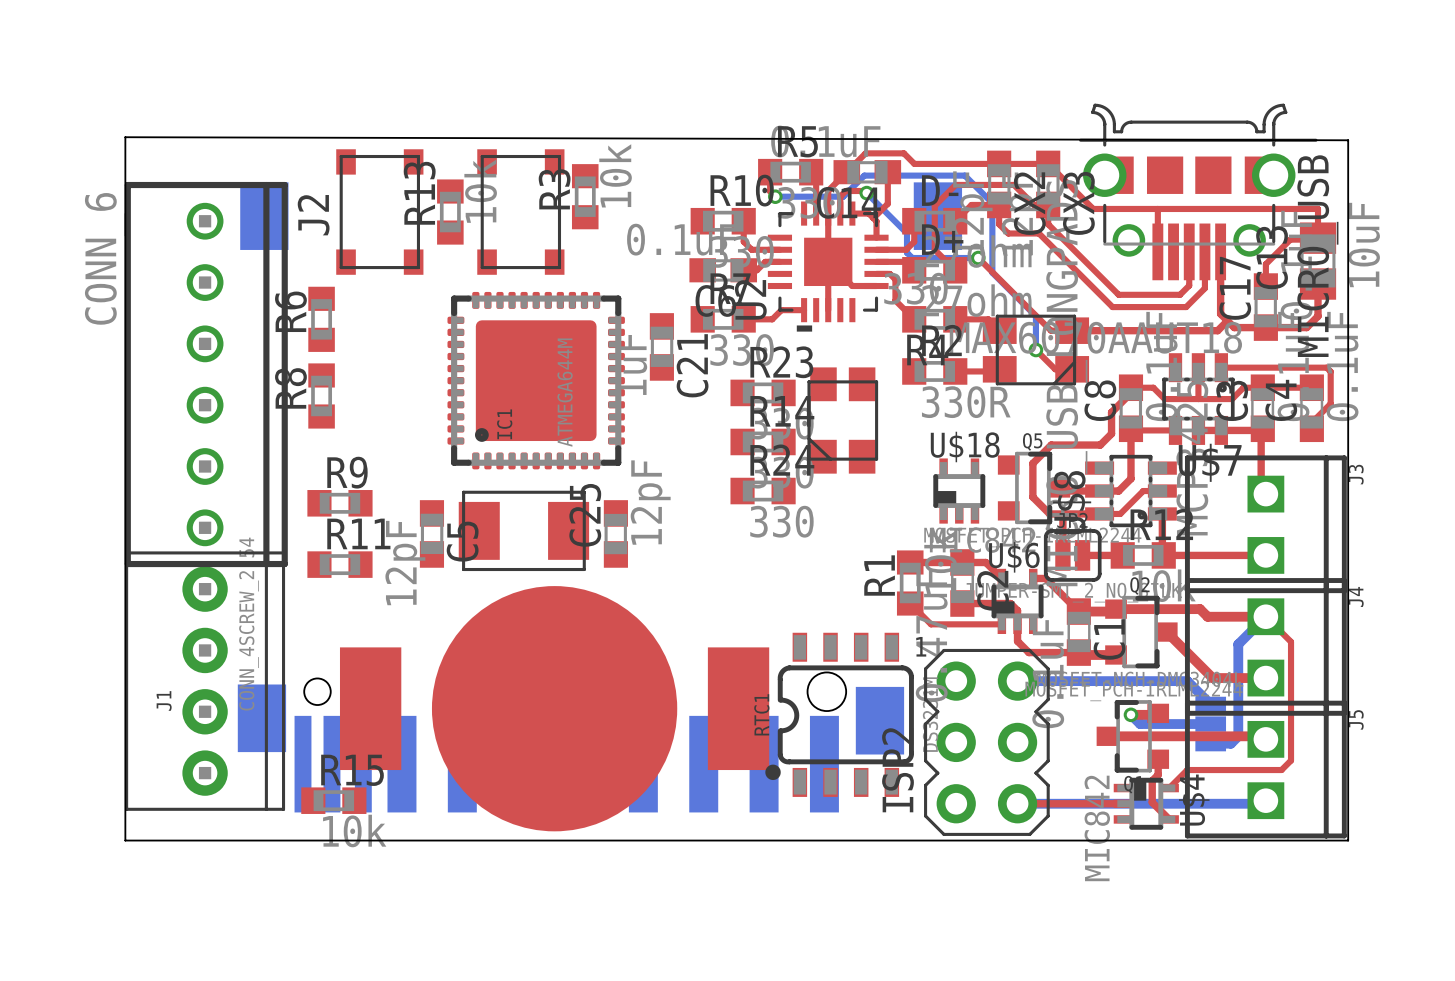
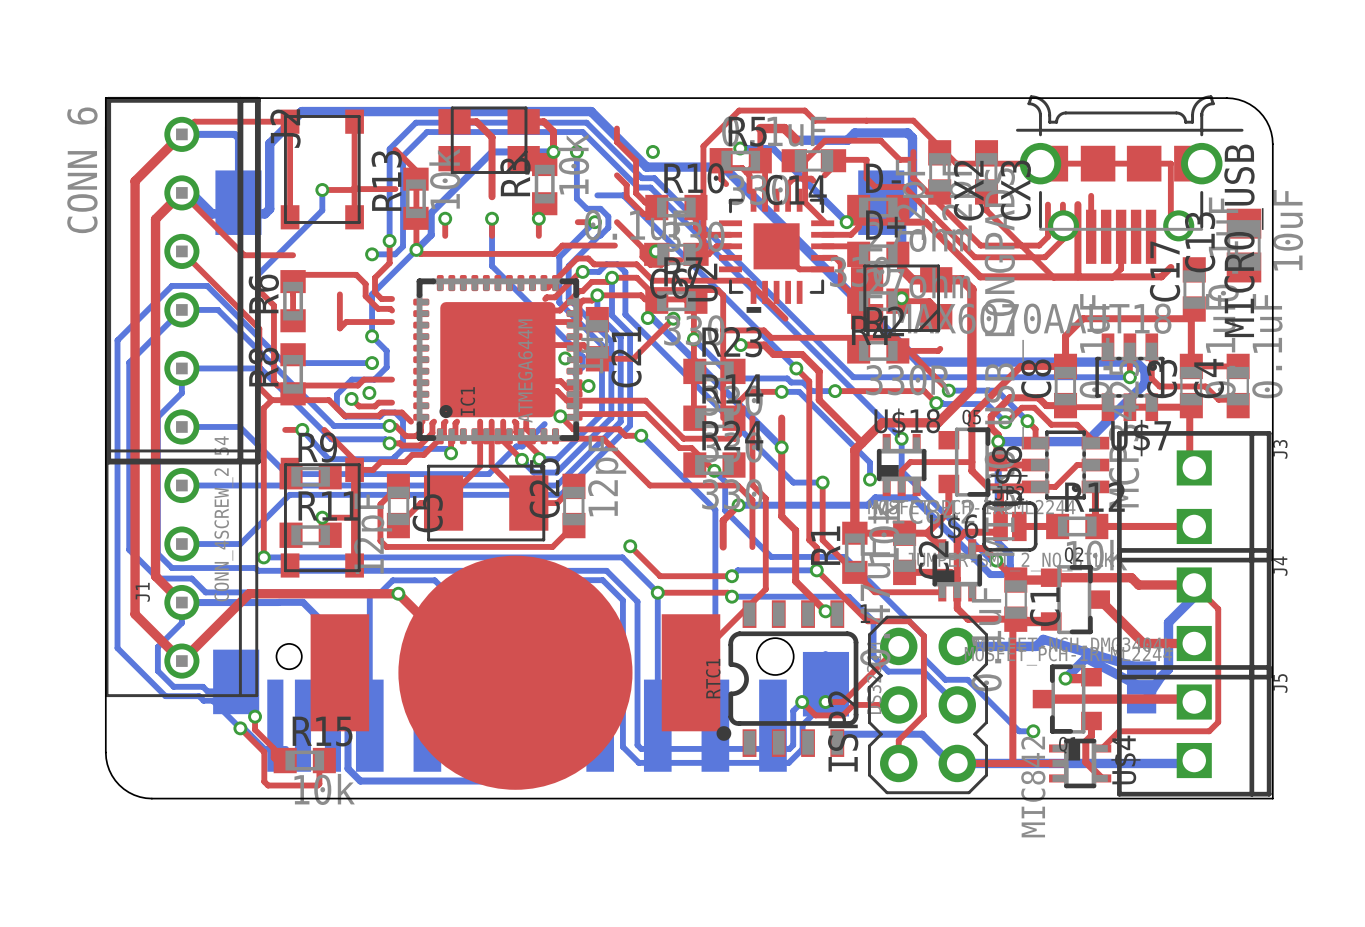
top track: none -> (354, 121) (354, 217)
top track: none -> (454, 121) (476, 121) (492, 137) (492, 196)
top track: none -> (523, 121) (543, 121) (553, 131) (553, 151)
board edge: (125, 137) (1348, 140) (1348, 154) -> (105, 127) (105, 98) (1226, 98) (1244, 101) (1259, 111) (1269, 126) (1272, 144)
top track: none -> (616, 128) (616, 142) (636, 161) (636, 193) (645, 202) (657, 202)
bottom track: none -> (181, 134) (234, 134) (238, 138) (238, 202)
part: none -> (489, 140)
top track: none -> (796, 140) (784, 128) (760, 128) (760, 158) (746, 172)
bottom track: none -> (796, 140) (847, 140) (854, 132) (907, 132) (912, 137) (912, 209) (901, 219) (901, 268)
bottom track: none -> (740, 148) (773, 148) (846, 222)
top track: none -> (395, 149) (416, 170) (416, 249) (420, 253) (554, 253) (562, 245) (614, 245)
bottom track: none -> (553, 151) (492, 151) (431, 212) (431, 235) (372, 294) (372, 336) (386, 350) (386, 367) (374, 379) (351, 379) (336, 394) (336, 407) (345, 416) (380, 416) (384, 412) (395, 412) (403, 420) (403, 448)
via: none -> (553, 151)
bottom track: none -> (576, 151) (576, 198) (586, 208) (600, 208) (608, 216) (608, 227) (568, 266) (568, 298) (611, 341) (611, 417) (556, 472) (533, 472) (521, 459)
via: none -> (576, 151)
via: none -> (652, 151)
top track: none -> (913, 151) (913, 178) (980, 245) (1039, 245) (1047, 236) (1047, 204)
top track: (887, 172) (887, 203) (873, 218) -> none
top track: none -> (616, 175) (626, 185) (626, 197) (643, 214) (657, 214)
bottom track: (866, 193) (907, 233) (907, 252) (912, 258) (978, 258) -> none
via: (866, 193) -> none
bottom track: (775, 196) (843, 196) (864, 175) (964, 175) (992, 203) (992, 272) (1035, 316) (1035, 350) -> none
via position: (775, 196) -> (740, 148)
top track: none -> (354, 187) (356, 189) (395, 189)
top track: none -> (322, 189) (354, 189)
bottom track: none -> (322, 189) (322, 210) (257, 274)
via: none -> (322, 189)
top track: (1048, 204) (1034, 204) (1014, 184) (955, 184) (934, 205) (934, 249) (955, 270) -> (913, 159) (899, 159) (880, 140) (825, 140) (805, 160) (805, 202) (824, 222)
bottom track: none -> (181, 192) (191, 192) (212, 213) (264, 213) (269, 209) (269, 143) (301, 111) (591, 111) (646, 167) (723, 167) (918, 362) (1136, 362) (1145, 370) (1145, 383) (1086, 441) (998, 441) (998, 542) (1010, 554) (1010, 566) (1002, 574) (990, 574) (913, 497) (875, 497) (868, 505) (738, 505)
bottom track: none -> (597, 195) (623, 195) (796, 368)
part position: (379, 212) -> (322, 169)
part: (520, 212) -> none
top track: (852, 213) (868, 213) (876, 221) (876, 237) -> (726, 168) (742, 168) (749, 175) (749, 191)
top track: none -> (1077, 204) (1077, 276)
top track: (955, 221) (971, 204) (999, 204) (999, 224) (1008, 233) (1039, 233) (1112, 307) (1186, 307) (1204, 288) (1204, 251) -> (824, 175) (840, 159) (866, 159) (866, 178) (875, 187) (904, 187) (974, 257) (1045, 257) (1062, 239) (1062, 204)
top track: none -> (290, 217) (290, 121) (194, 121) (135, 181) (135, 614) (181, 661) (249, 593) (398, 593) (477, 672) (515, 672)
top track: none -> (445, 218) (445, 235)
via: none -> (445, 218)
top track: none -> (492, 218) (492, 235)
bottom track: none -> (492, 218) (492, 266) (582, 356) (582, 366) (575, 374)
via: none -> (492, 218)
top track: none -> (538, 218) (538, 235)
via: none -> (538, 218)
top track: none -> (577, 222) (594, 222)
bottom track: none -> (594, 222) (559, 257) (559, 302) (601, 345) (601, 414) (556, 459) (539, 459)
via: none -> (594, 222)
top track: none -> (616, 222) (642, 247) (642, 256) (650, 264) (661, 264) (666, 260) (680, 260)
top track: none -> (846, 222) (925, 222) (980, 276) (1161, 276) (1170, 267)
via: none -> (846, 222)
top track: none -> (1170, 223) (1170, 163) (956, 163) (913, 120) (815, 120) (804, 110) (739, 110) (703, 146) (703, 260)
top track: (1220, 251) (1220, 313) (1234, 327) (1306, 327) (1318, 316) (1318, 284) -> none
top track: none -> (389, 240) (389, 263) (374, 277) (374, 292) (381, 298) (392, 298)
bottom track: none -> (389, 240) (389, 149) (415, 122) (586, 122) (642, 178) (654, 178) (853, 377) (1129, 377)
via: none -> (389, 240)
top track: (978, 258) (1050, 330) (1217, 330) (1227, 320) -> none
via: (978, 258) -> none
via: none -> (416, 249)
top track: none -> (181, 251) (259, 328) (259, 387) (271, 400)
via: none -> (655, 251)
bottom track: none -> (372, 254) (395, 254) (403, 246) (403, 156) (427, 132) (582, 132) (638, 187) (650, 187) (901, 438) (901, 470) (991, 560) (996, 560)
via: none -> (372, 254)
top track: none -> (293, 255) (244, 255) (181, 192) (155, 219) (155, 576) (181, 602)
top track: none -> (901, 268) (912, 279) (962, 279) (971, 289) (971, 388) (938, 422) (882, 422) (854, 450) (854, 533)
top track: (1265, 286) (1265, 264) (1290, 239) (1318, 238) (1318, 208) (1093, 208) (1048, 163) (914, 163) (903, 153) (865, 153) (828, 190) (828, 310) -> none
top track: none -> (582, 271) (580, 271) (554, 297) (545, 298)
bottom track: none -> (582, 271) (598, 271) (606, 264) (617, 264) (625, 272) (625, 314) (793, 482) (822, 482)
via: none -> (582, 271)
top track: none -> (257, 274) (257, 289) (273, 305) (273, 381) (277, 385) (357, 385) (363, 379) (392, 379)
bottom track: none -> (612, 277) (612, 315) (630, 333) (630, 425) (560, 494) (289, 494) (240, 544) (181, 544)
via: none -> (612, 277)
top track: none -> (545, 287) (548, 287) (577, 258) (588, 258) (594, 264) (636, 264) (652, 280) (747, 280) (785, 318)
top track: (804, 310) (781, 310) (772, 319) (743, 319) -> none
top track: none -> (339, 294) (339, 328) (346, 322) (392, 322)
bottom track: none -> (597, 295) (597, 314) (620, 337) (620, 421) (556, 485) (181, 485)
via: none -> (597, 295)
part: none -> (901, 298)
via: none -> (901, 298)
top track: none -> (392, 310) (378, 308) (365, 296) (365, 284) (356, 274) (298, 274) (293, 280) (293, 328)
top track: none -> (545, 310) (559, 310) (591, 281) (607, 281) (612, 277) (636, 277) (649, 290) (717, 290) (723, 295) (723, 418)
bottom track: none -> (647, 318) (652, 318) (781, 447)
via: none -> (647, 318)
top track: none -> (673, 318) (633, 358) (597, 358) (583, 345) (545, 345)
via: none -> (673, 318)
top track: none -> (545, 322) (576, 322) (579, 318) (579, 304) (583, 300) (592, 300) (597, 295) (641, 295) (645, 299) (685, 299) (693, 308) (693, 418)
C21 position: (661, 346) -> (597, 339)
top track: none -> (723, 330) (763, 330) (771, 337) (895, 337) (948, 390)
top track: (1035, 350) (1055, 369) (1072, 369) -> none
part: (1035, 350) -> none
via: (1035, 350) -> none
via: none -> (372, 336)
bottom track: none -> (693, 339) (733, 378) (787, 378) (791, 382) (803, 382) (811, 391) (835, 391)
via: none -> (693, 339)
top track: none -> (740, 345) (764, 345) (773, 354) (802, 354) (819, 371) (819, 400) (862, 442)
via: none -> (740, 345)
top track: (1221, 367) (1326, 367) (1330, 371) (1330, 403) (1311, 422) -> (1151, 347) (1151, 378) (1159, 386) (1205, 386) (1218, 399) (1238, 399)
J2 position: (206, 374) -> (183, 280)
via: none -> (565, 358)
bottom track: none -> (372, 363) (284, 363) (207, 285) (171, 285) (117, 340) (117, 648) (165, 696) (199, 696) (203, 700) (212, 700) (264, 748) (286, 748)
via: none -> (372, 363)
top track: (1130, 387) (1153, 387) (1164, 399) (1232, 399) (1243, 387) (1262, 387) -> (971, 438) (971, 415) (1020, 366) (1065, 366) (1065, 336) (1083, 318) (1191, 318) (1191, 366)
top track: none -> (796, 368) (809, 381) (809, 540) (816, 547) (816, 570) (867, 621) (909, 621) (923, 636) (923, 715) (898, 740) (898, 763)
via: none -> (796, 368)
top track: (1130, 393) (1111, 412) (1111, 433) (1100, 445) (1051, 445) (1032, 463) -> none
via: none -> (1129, 377)
top track: none -> (545, 379) (560, 381) (567, 387) (588, 386)
via: none -> (588, 386)
top track: none -> (545, 391) (557, 391) (566, 400) (645, 400) (683, 438) (734, 438) (739, 434) (739, 401) (748, 391) (781, 391)
top track: none -> (835, 391) (924, 391) (936, 403)
via: none -> (835, 391)
bottom track: none -> (948, 390) (996, 390) (1027, 421)
via: none -> (948, 390)
bottom track: none -> (781, 391) (799, 391) (870, 462) (870, 479)
via: none -> (781, 391)
via: none -> (369, 393)
part: (842, 420) -> none
top track: none -> (351, 398) (359, 406) (374, 406) (378, 402) (392, 402)
via: none -> (351, 398)
top track: none -> (271, 400) (328, 400) (344, 415) (378, 415) (382, 412) (401, 412) (411, 421)
top track: none -> (271, 400) (263, 408) (263, 557)
bottom track: none -> (936, 403) (986, 404) (1005, 422)
via: none -> (936, 403)
top track: (1130, 428) (1130, 478) (1118, 491) (1099, 491) -> (1065, 405) (1046, 405) (1038, 397) (1009, 397) (991, 416) (991, 428) (998, 435) (997, 462)
top track: none -> (579, 414) (645, 414) (679, 448) (691, 448) (714, 470)
top track: none -> (560, 416) (573, 429) (619, 429) (625, 435) (641, 435)
via: none -> (560, 416)
top track: none -> (752, 418) (752, 485) (765, 498) (765, 589) (682, 672) (682, 681) (691, 672)
top track: none -> (781, 418) (781, 516) (795, 530) (795, 581) (825, 611)
top track: none -> (422, 421) (420, 431) (416, 436) (405, 436) (395, 425) (389, 425)
top track: none -> (434, 421) (432, 433) (420, 445) (389, 443)
top track: none -> (445, 421) (443, 434) (423, 454) (412, 454) (405, 462) (380, 462) (373, 469) (354, 469)
top track: none -> (457, 421) (455, 436) (451, 440) (451, 453)
top track: none -> (480, 421) (480, 466) (443, 503) (420, 503) (398, 525)
top track: none -> (491, 421) (491, 465) (528, 503) (557, 503) (573, 486)
top track: none -> (503, 421) (503, 441) (521, 459)
top track: none -> (514, 421) (516, 432) (539, 455) (539, 459)
top track: none -> (526, 421) (526, 428) (535, 438) (603, 438) (650, 485) (737, 485) (752, 500) (752, 547)
top track: none -> (1027, 421) (1035, 429) (1035, 443)
via: none -> (1027, 421)
top track: none -> (1005, 422) (1021, 407) (1034, 407) (1051, 424) (1077, 424) (1095, 443)
via: none -> (1005, 422)
bottom track: none -> (544, 424) (522, 446) (516, 446) (488, 474) (286, 474) (239, 426) (181, 426)
bottom track: none -> (389, 425) (334, 425) (218, 309) (181, 309) (129, 362) (129, 549) (157, 578) (191, 578) (205, 592) (380, 592) (392, 580) (434, 580) (464, 610) (464, 745) (468, 748) (501, 748) (505, 745) (505, 609) (534, 580) (602, 580) (622, 600) (622, 746) (638, 762) (788, 762) (802, 749) (802, 725) (825, 702)
via: none -> (389, 425)
top track: none -> (285, 429) (302, 429)
bottom track: none -> (302, 429) (328, 459) (392, 459) (394, 456)
via: none -> (302, 429)
top track: none -> (324, 429) (354, 460) (354, 469)
bottom track: none -> (641, 435) (715, 509) (715, 725)
via: none -> (641, 435)
via: none -> (901, 438)
via: none -> (998, 441)
bottom track: none -> (389, 443) (385, 439) (331, 439) (260, 368) (181, 368) (181, 393) (157, 417) (157, 553) (171, 568) (255, 568) (258, 570) (606, 570) (637, 601) (637, 745) (641, 748) (789, 748) (793, 745) (793, 710) (802, 702)
via: none -> (389, 443)
via: none -> (781, 447)
bottom track: none -> (403, 448) (395, 456)
bottom track: none -> (403, 448) (446, 448) (451, 453)
via: none -> (451, 453)
via: none -> (539, 459)
via: none -> (521, 459)
top track: none -> (971, 462) (910, 462) (901, 470) (901, 486)
top track: none -> (354, 469) (354, 565)
bottom track: none -> (714, 470) (725, 481) (725, 510) (771, 556) (844, 556) (923, 636) (923, 658) (945, 679) (967, 679) (1019, 731) (1033, 731)
via: none -> (714, 470)
via: none -> (870, 479)
top track: none -> (822, 482) (822, 540) (854, 572)
via: none -> (822, 482)
top track: none -> (948, 483) (948, 511) (927, 533)
top track: none -> (398, 486) (380, 504) (380, 540) (386, 546) (552, 546) (573, 525)
top track: none -> (738, 505) (723, 520) (723, 547)
via: none -> (738, 505)
top track: none -> (322, 517) (354, 517)
part: none -> (322, 517)
via: none -> (322, 517)
J1 footprint: [125, 551, 286, 811] -> [105, 449, 259, 698]
top track: none -> (1000, 526) (994, 532) (965, 532) (957, 540) (957, 579)
top track: none -> (630, 546) (660, 576) (731, 576)
via: none -> (630, 546)
bottom track: none -> (263, 557) (622, 557) (657, 592) (657, 725)
via: none -> (263, 557)
via: none -> (996, 560)
bottom track: none -> (816, 570) (737, 570) (731, 576)
via: none -> (816, 570)
via: none -> (731, 576)
bottom track: (1265, 616) (1238, 644) (1238, 736) (1230, 743) (1210, 743) -> (1194, 584) (1194, 596) (1168, 622) (1168, 669) (1160, 676) (1141, 706)
bottom track: none -> (369, 592) (369, 725)
top track: none -> (657, 592) (728, 592) (731, 596)
via: none -> (657, 592)
via: none -> (398, 593)
bottom track: none -> (731, 596) (849, 596) (873, 621) (873, 656) (888, 671) (923, 671) (957, 704)
via: none -> (731, 596)
bottom track: none -> (278, 602) (302, 602) (348, 647) (348, 768) (360, 781) (533, 781) (542, 771) (542, 725)
bottom track: none -> (278, 602) (181, 602) (181, 623) (157, 647) (157, 670) (173, 686) (203, 686) (207, 691) (229, 691) (255, 716)
via: none -> (825, 611)
top track: none -> (1015, 619) (1012, 622) (1012, 763)
top track: none -> (898, 646) (843, 702) (825, 702)
bottom track: (1100, 681) (1187, 681) (1210, 704) -> (1036, 646) (1043, 639) (1141, 668)
bottom track: (1130, 714) (1140, 724) (1210, 724) -> (1065, 678) (1086, 658) (1141, 687)
top track: none -> (802, 702) (815, 715) (842, 715) (853, 704) (898, 704)
via: none -> (802, 702)
via: none -> (825, 702)
top track: none -> (255, 716) (255, 729) (273, 748) (273, 757) (282, 766)
via: none -> (255, 716)
top track: none -> (240, 728) (264, 752) (264, 781) (268, 785) (317, 785) (319, 768) (321, 766)
via: none -> (240, 728)
via: none -> (1033, 731)
bottom track: none -> (840, 734) (922, 734) (951, 763) (957, 763)
board edge: (125, 792) (125, 840) (173, 840) -> (105, 752) (109, 770) (119, 785) (134, 795) (151, 798)

